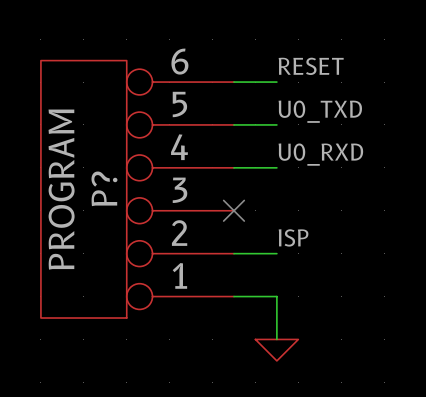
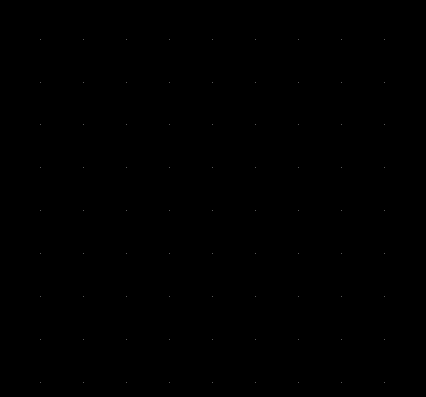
label: RESET (311, 66) -> none
wire: (233, 82) (276, 82) -> none
label: U0_TXD (320, 111) -> none
wire: (233, 124) (276, 124) -> none
label: U0_RXD (320, 154) -> none
wire: (233, 167) (276, 167) -> none
P?: PROGRAM (137, 189) -> none
no-connect mark: (233, 210) -> none
label: ISP (293, 237) -> none
wire: (233, 253) (276, 253) -> none
wire: (233, 296) (276, 296) (276, 339) -> none
power symbol: (276, 350) -> none

